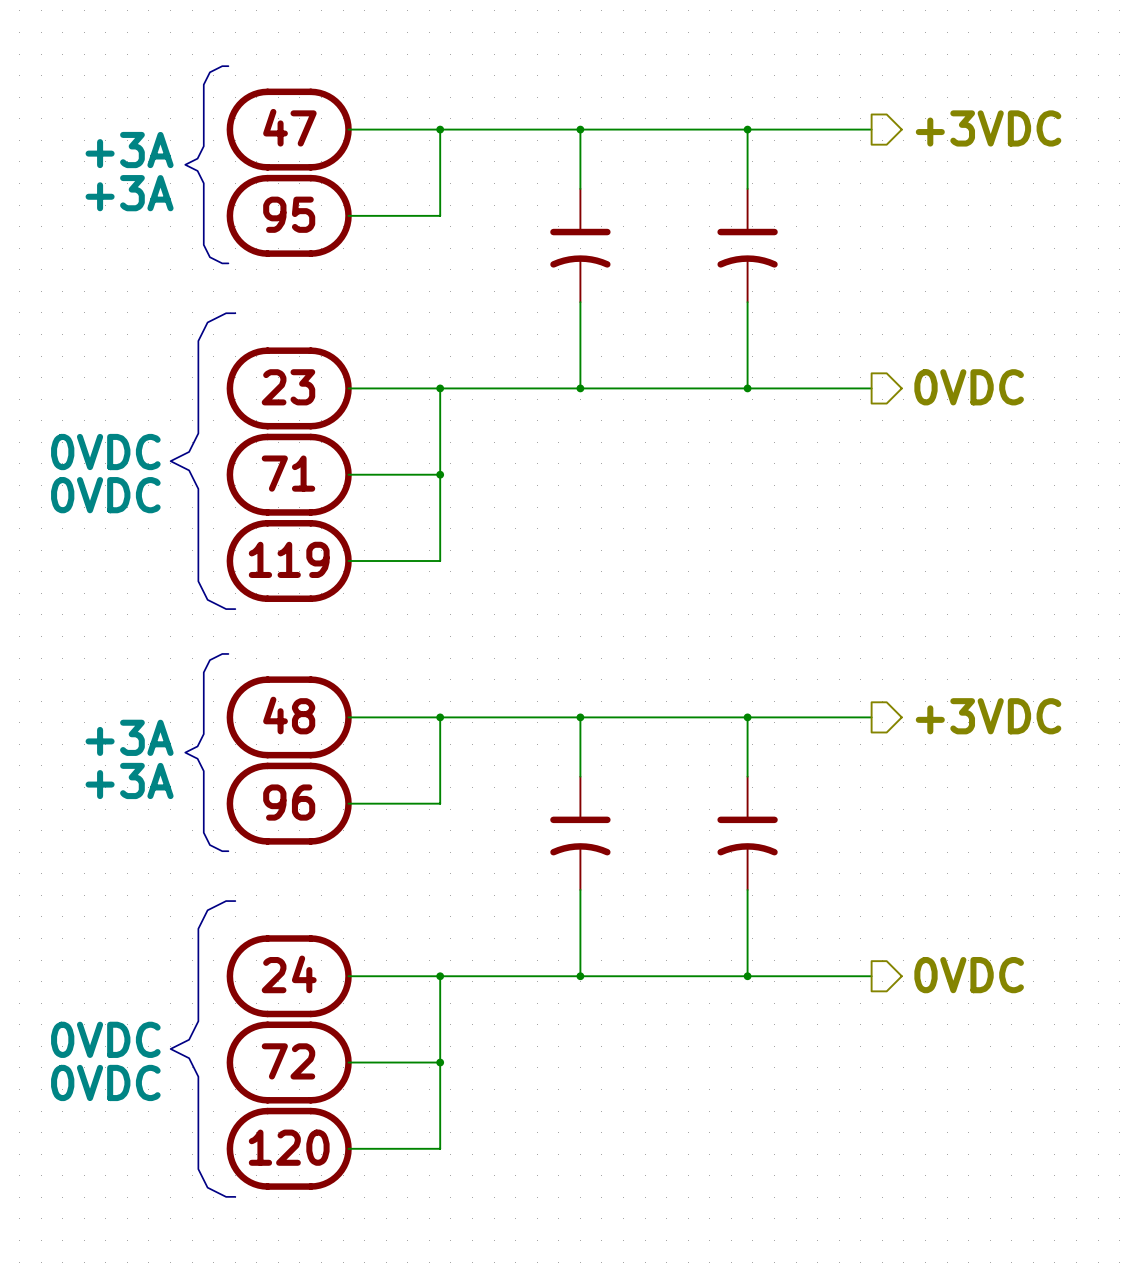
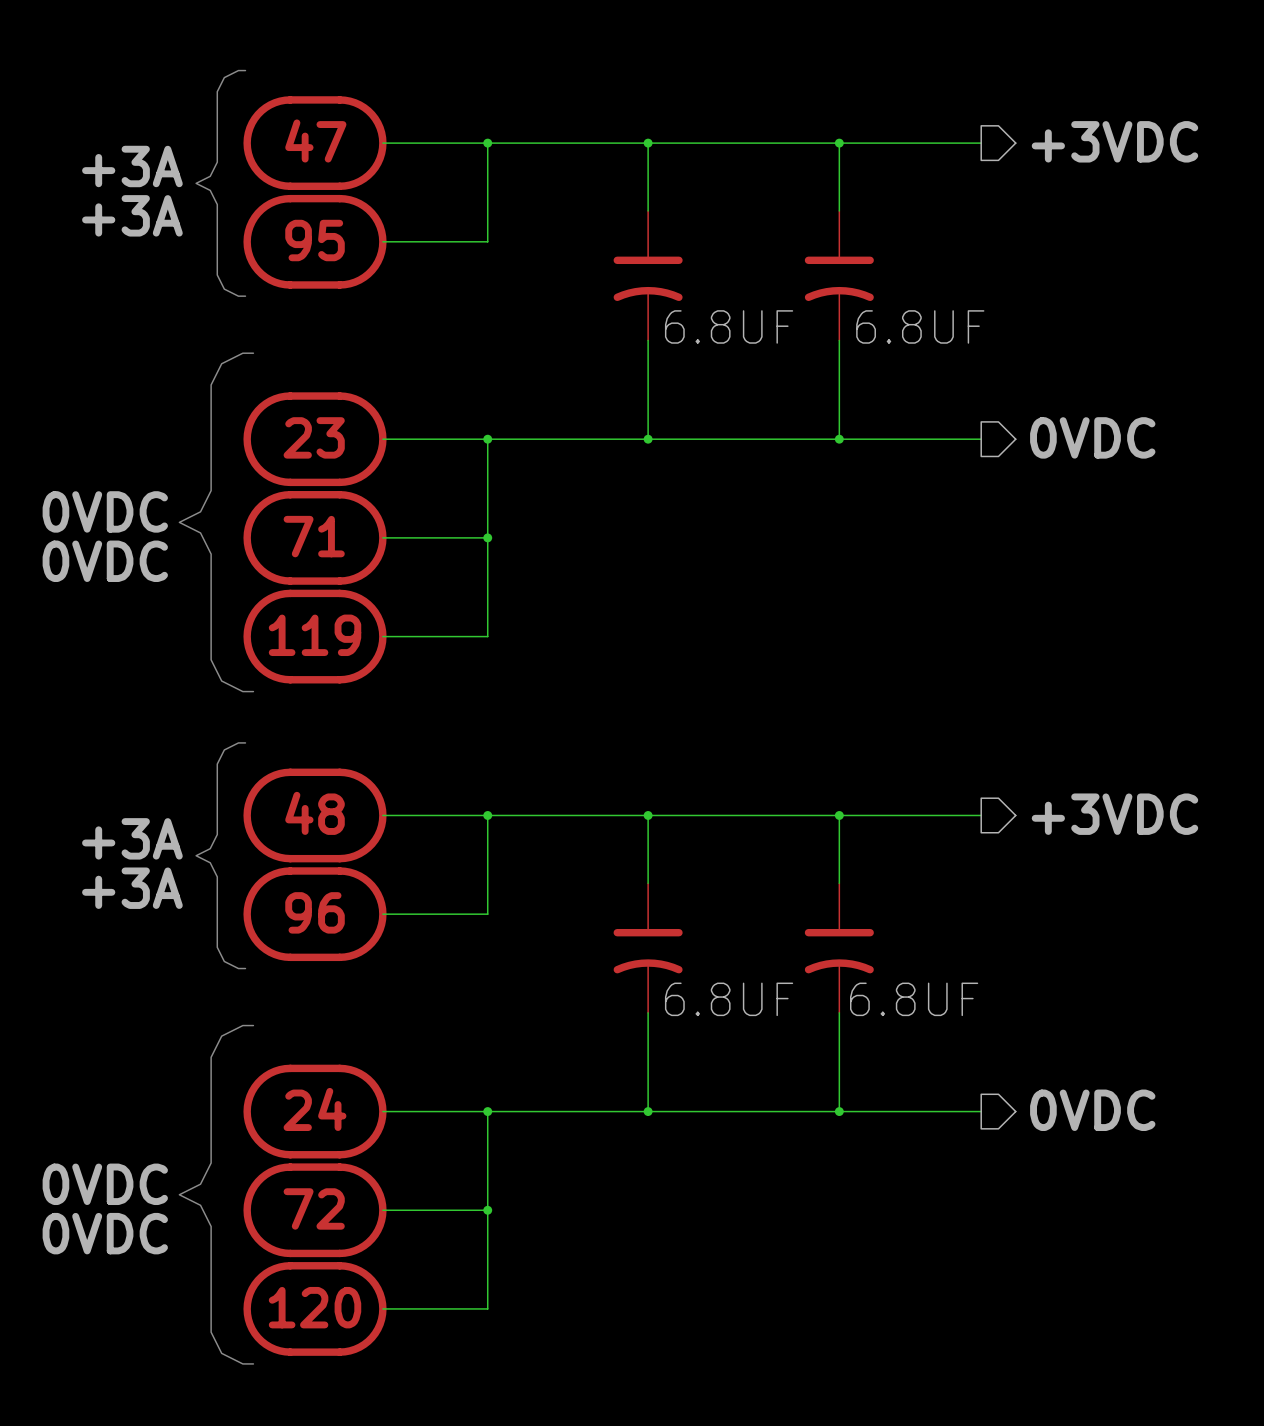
part value: none -> 6.8UF (729, 326)
part value: none -> 6.8UF (920, 326)
part value: none -> 6.8UF (729, 999)
part value: none -> 6.8UF (914, 999)

